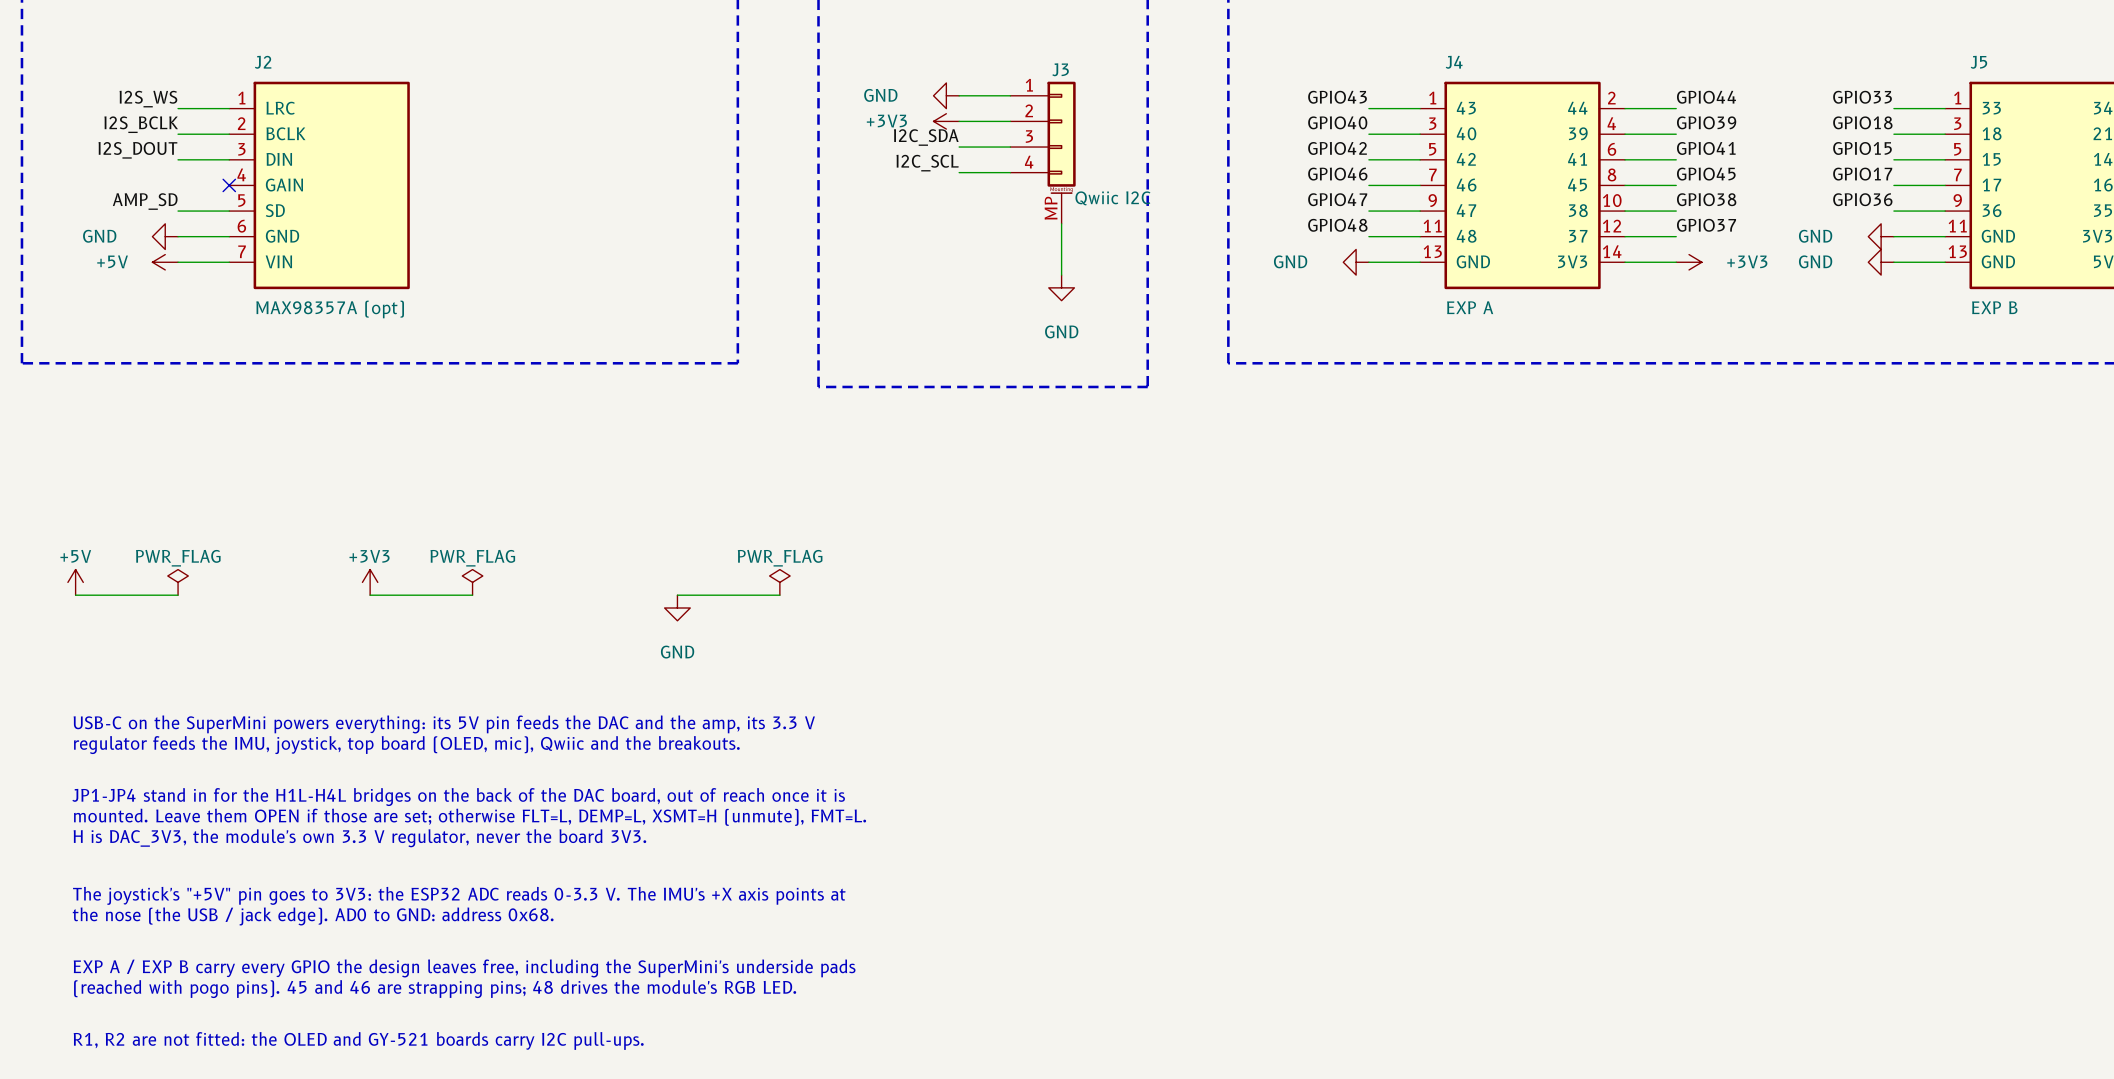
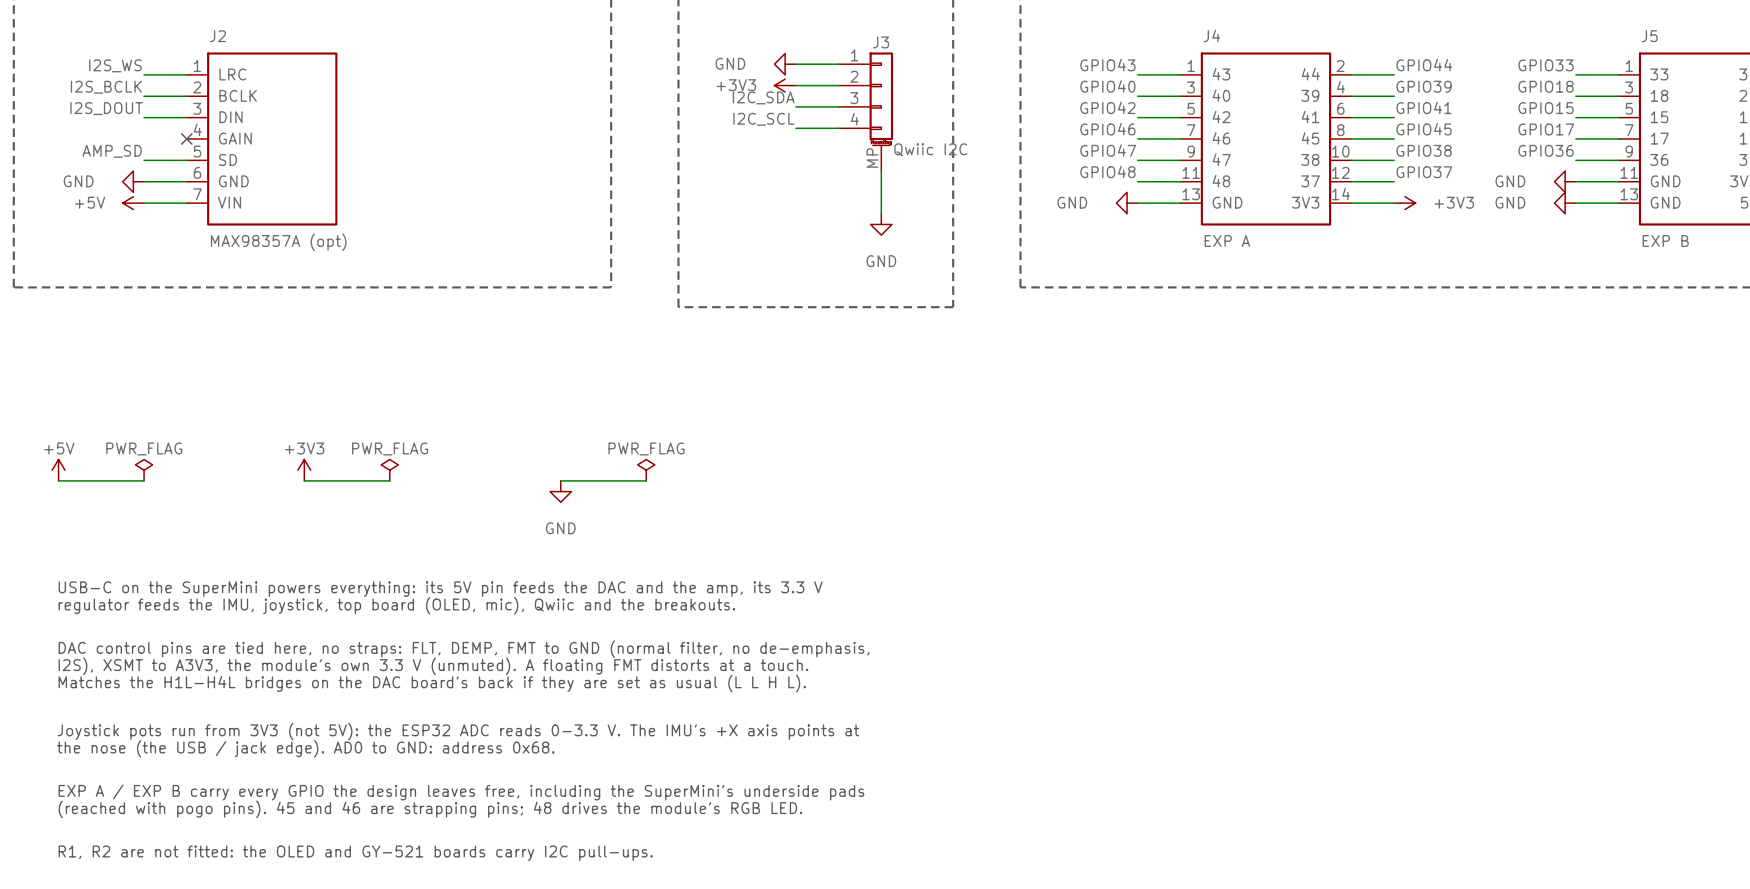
text: JP1-JP4 stand in for the H1L-H4L bridges on the back of the DAC board, out of reach once it is (458, 797) -> DAC control pins are tied here, no straps: FLT, DEMP, FMT to GND (normal filter, no de-emphasis, (464, 649)
text: mounted. Leave them OPEN if those are set; otherwise FLT=L, DEMP=L, XSMT=H (unmute), FMT=L. (470, 817) -> I2S), XSMT to A3V3, the module's own 3.3 V (unmuted). A floating FMT distorts at a touch. (433, 666)
text: H is DAC_3V3, the module's own 3.3 V regulator, never the board 3V3. (359, 838) -> Matches the H1L-H4L bridges on the DAC board's back if they are set as usual (L L H L). (432, 683)
text: The joystick's "+5V" pin goes to 3V3: the ESP32 ADC reads 0-3.3 V. The IMU's +X axis points at (459, 895) -> Joystick pots run from 3V3 (not 5V): the ESP32 ADC reads 0-3.3 V. The IMU's +X axis points at (458, 731)

